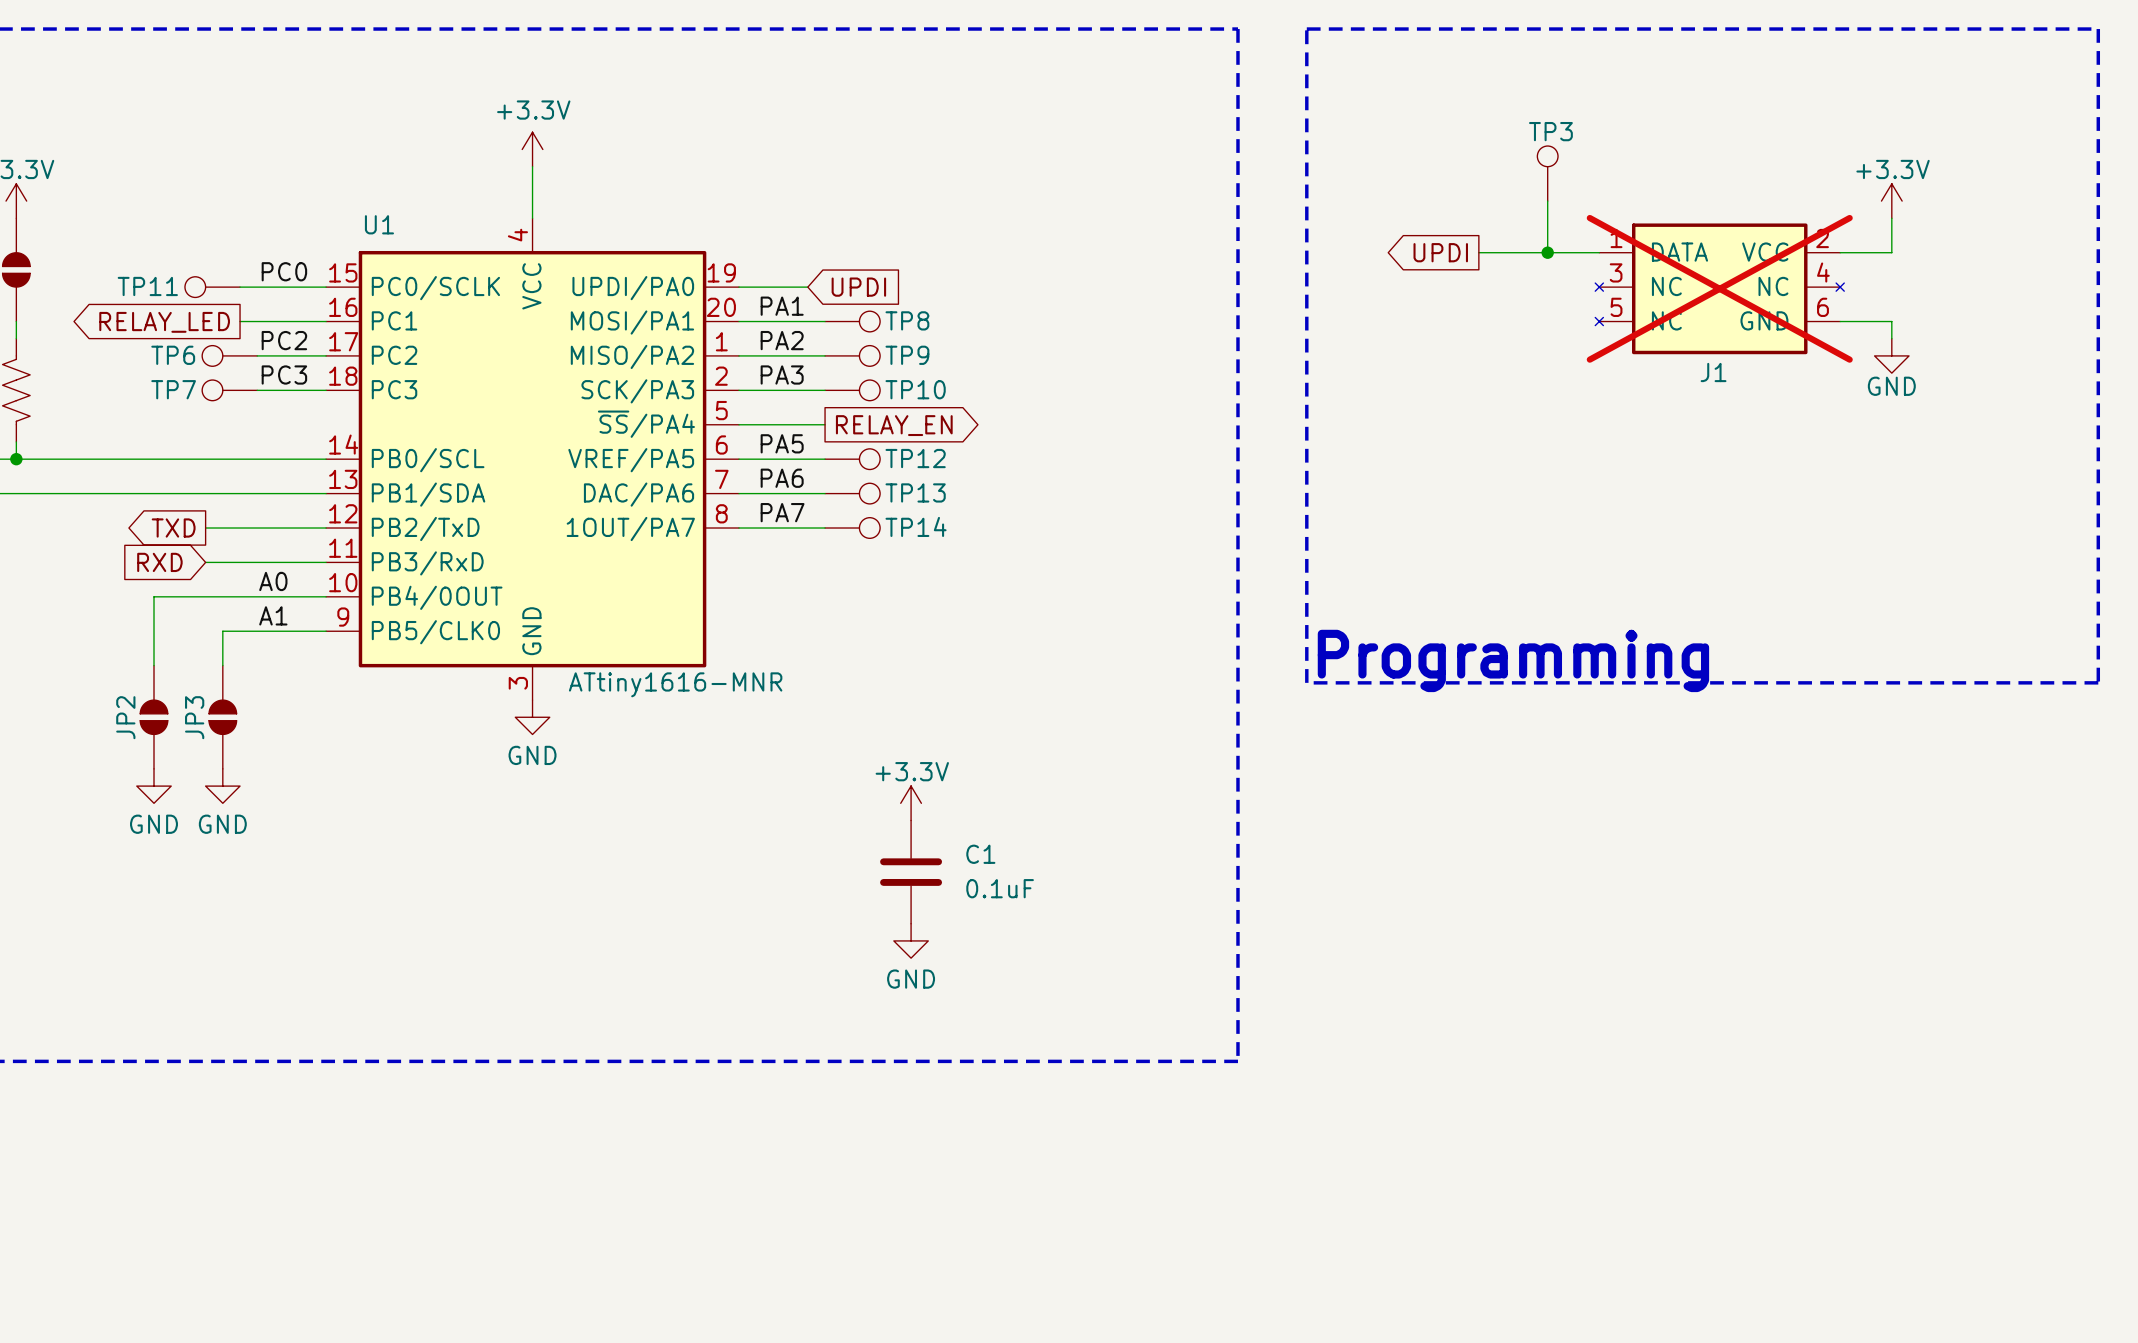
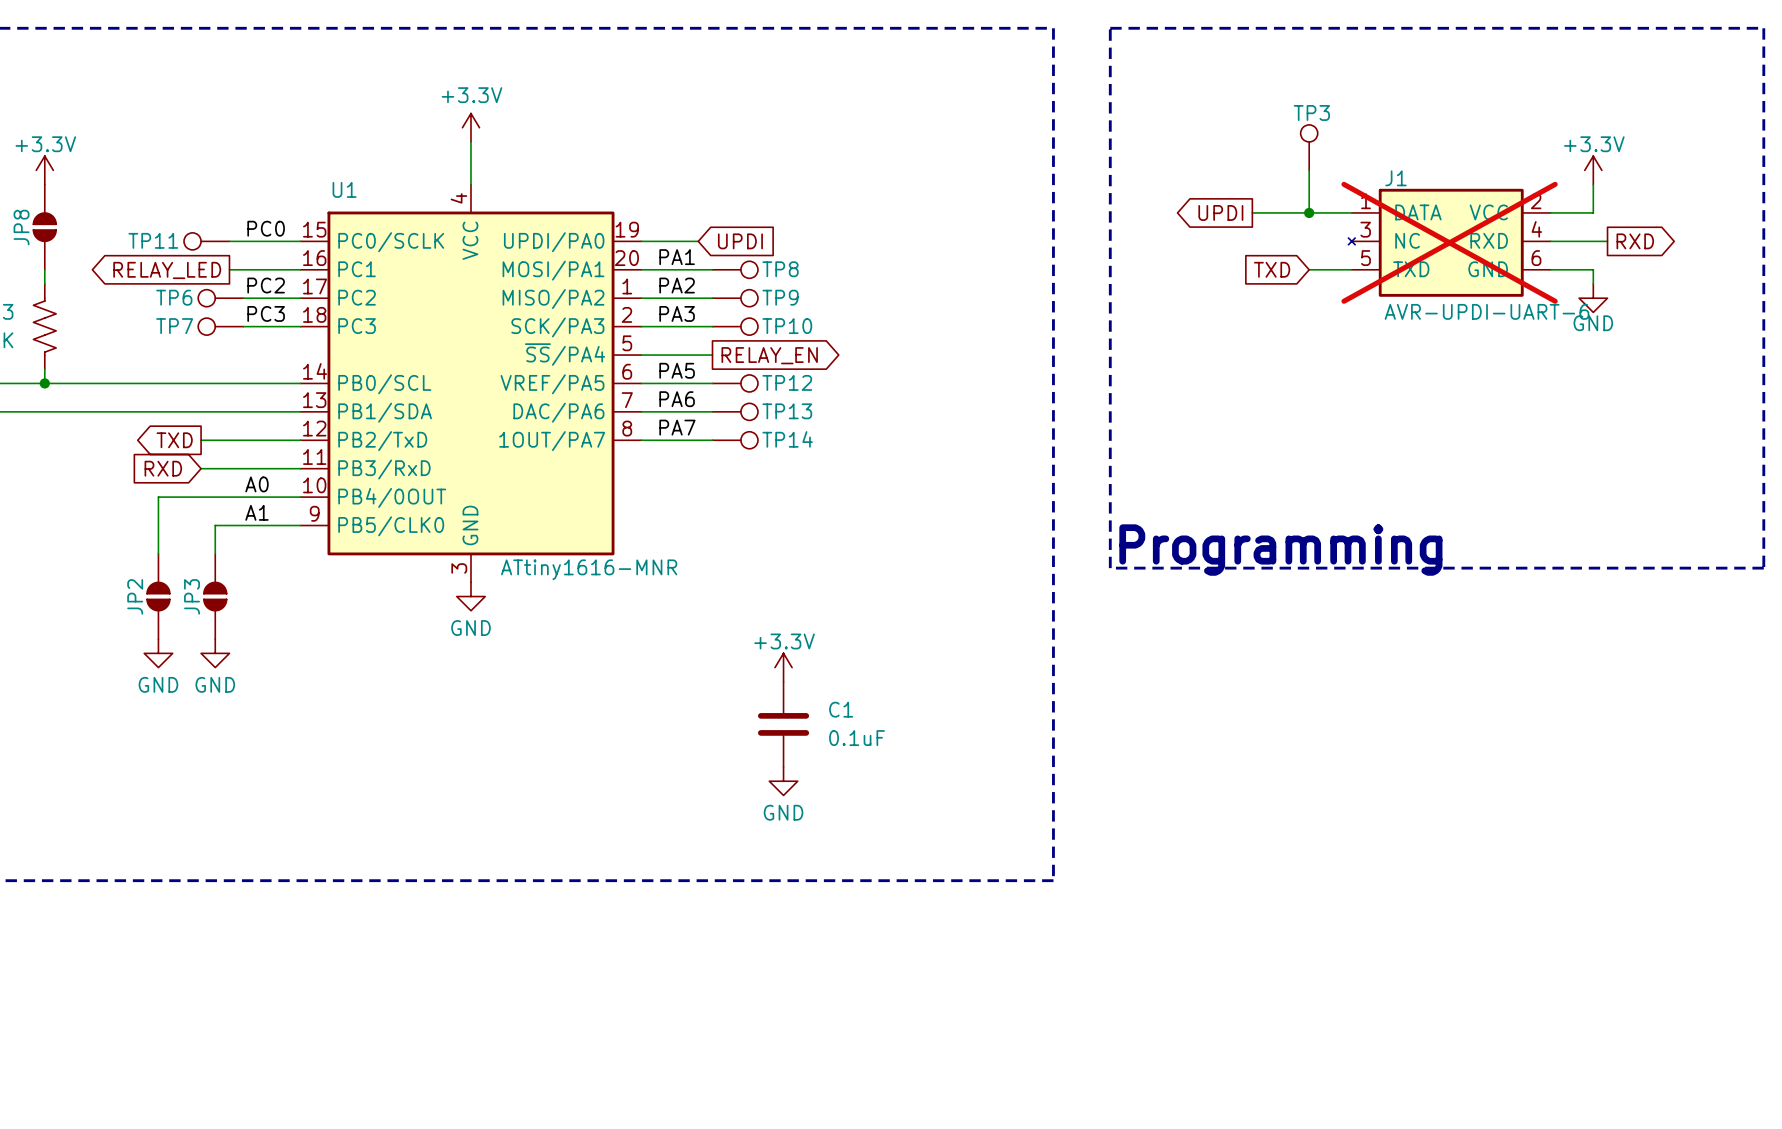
J1 symbol: [1595, 223, 1845, 355] -> [1348, 188, 1551, 297]
wire: none -> (1550, 241) (1607, 241)
global label: none -> RXD (1635, 241)
global label: none -> TXD (1272, 269)
wire: none -> (1309, 269) (1351, 269)
J1 name position: J1 (1713, 372) -> J1 (1396, 178)
J1 value: none -> AVR-UPDI-UART-6 (1487, 311)

